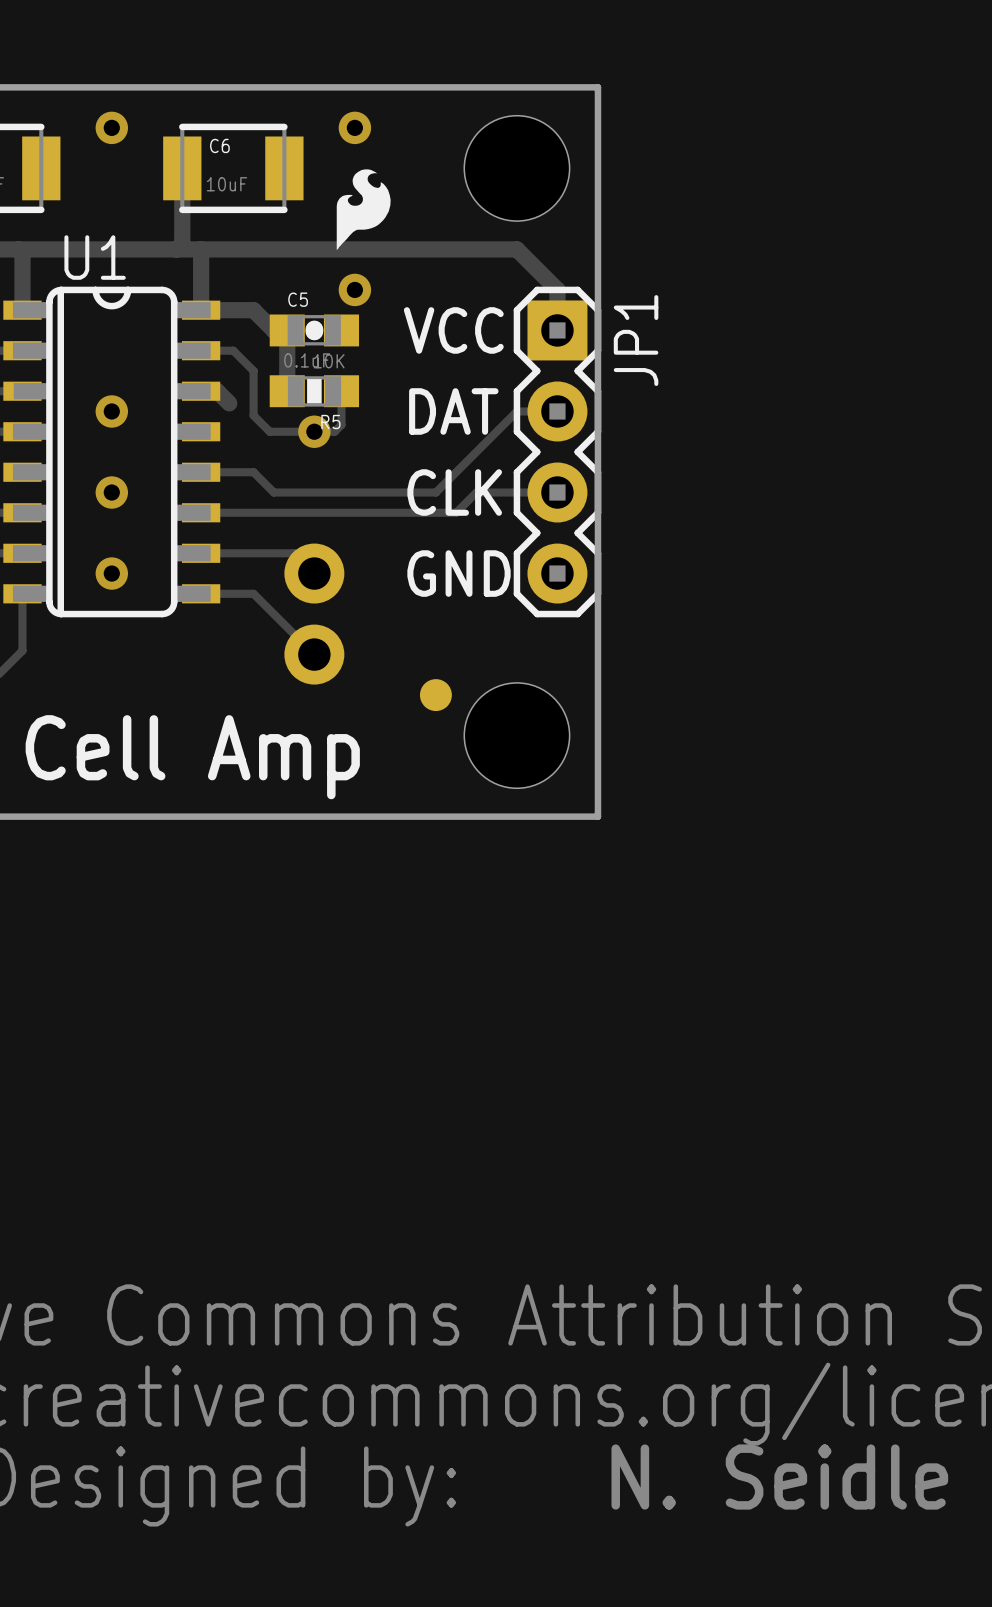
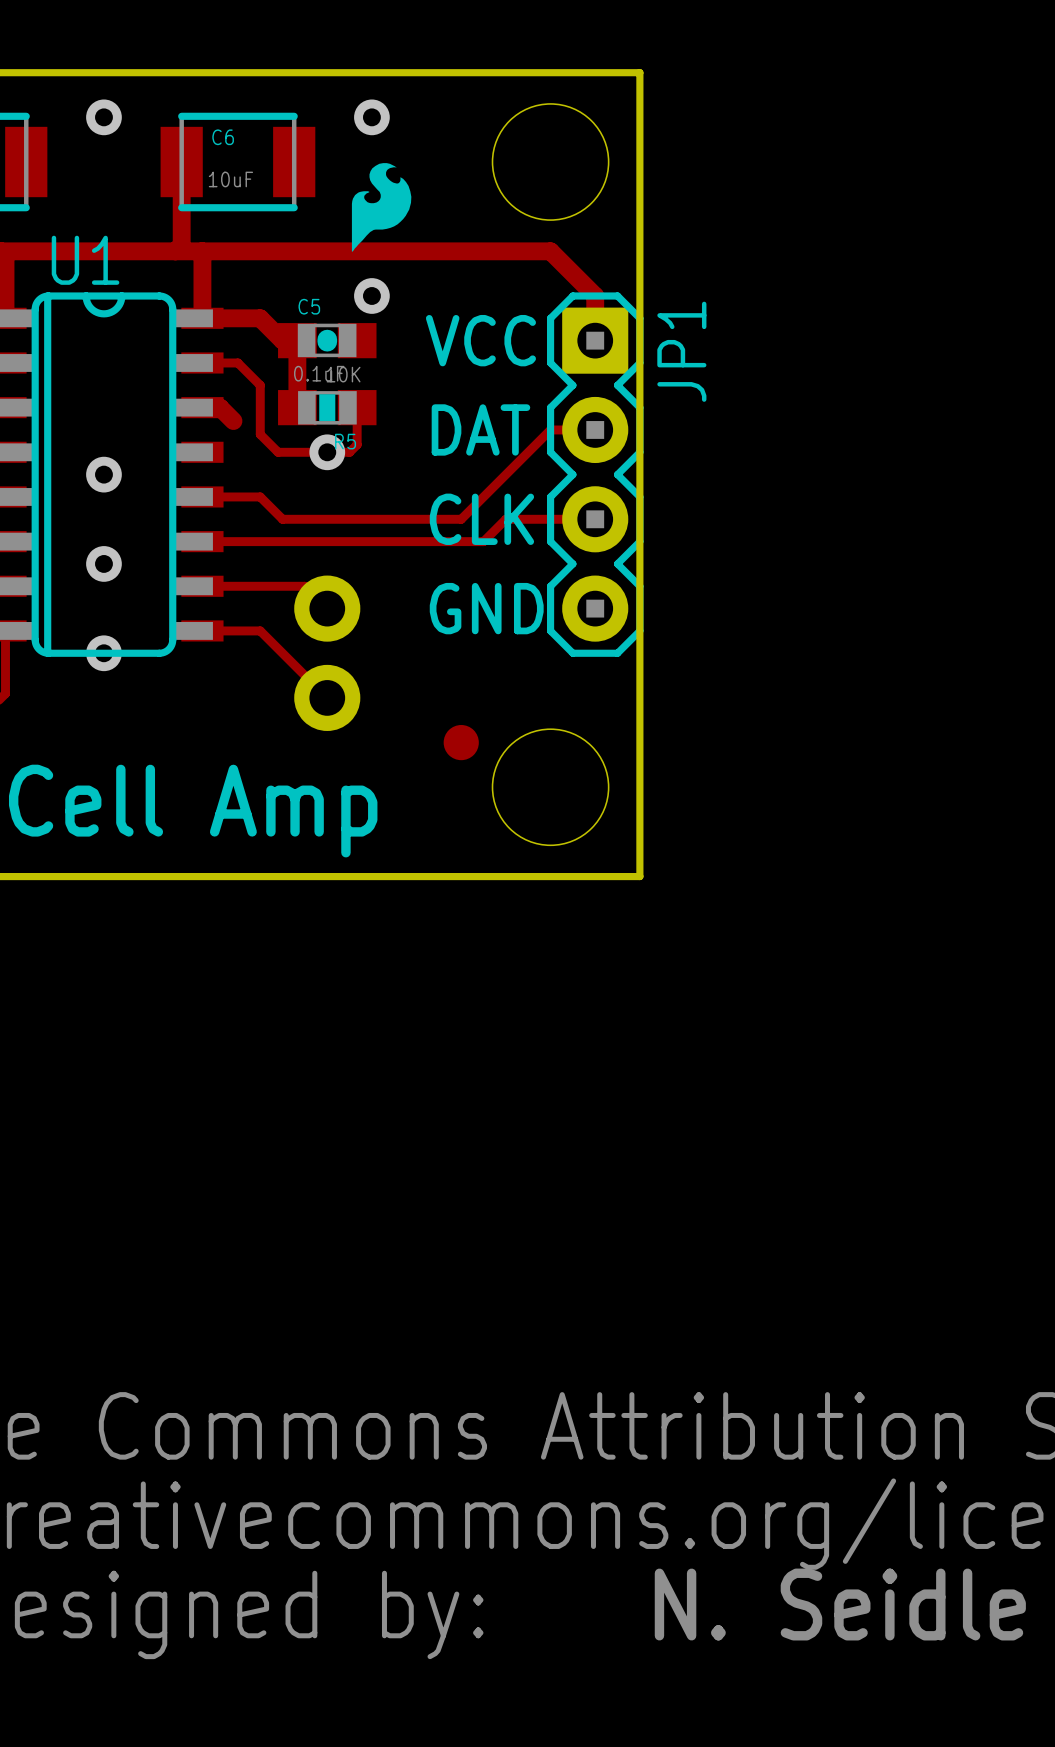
via: (111, 411) -> none
via: none -> (103, 474)
via: (111, 492) -> none
via: none -> (103, 563)
via: (111, 573) -> none
via: none -> (103, 653)

